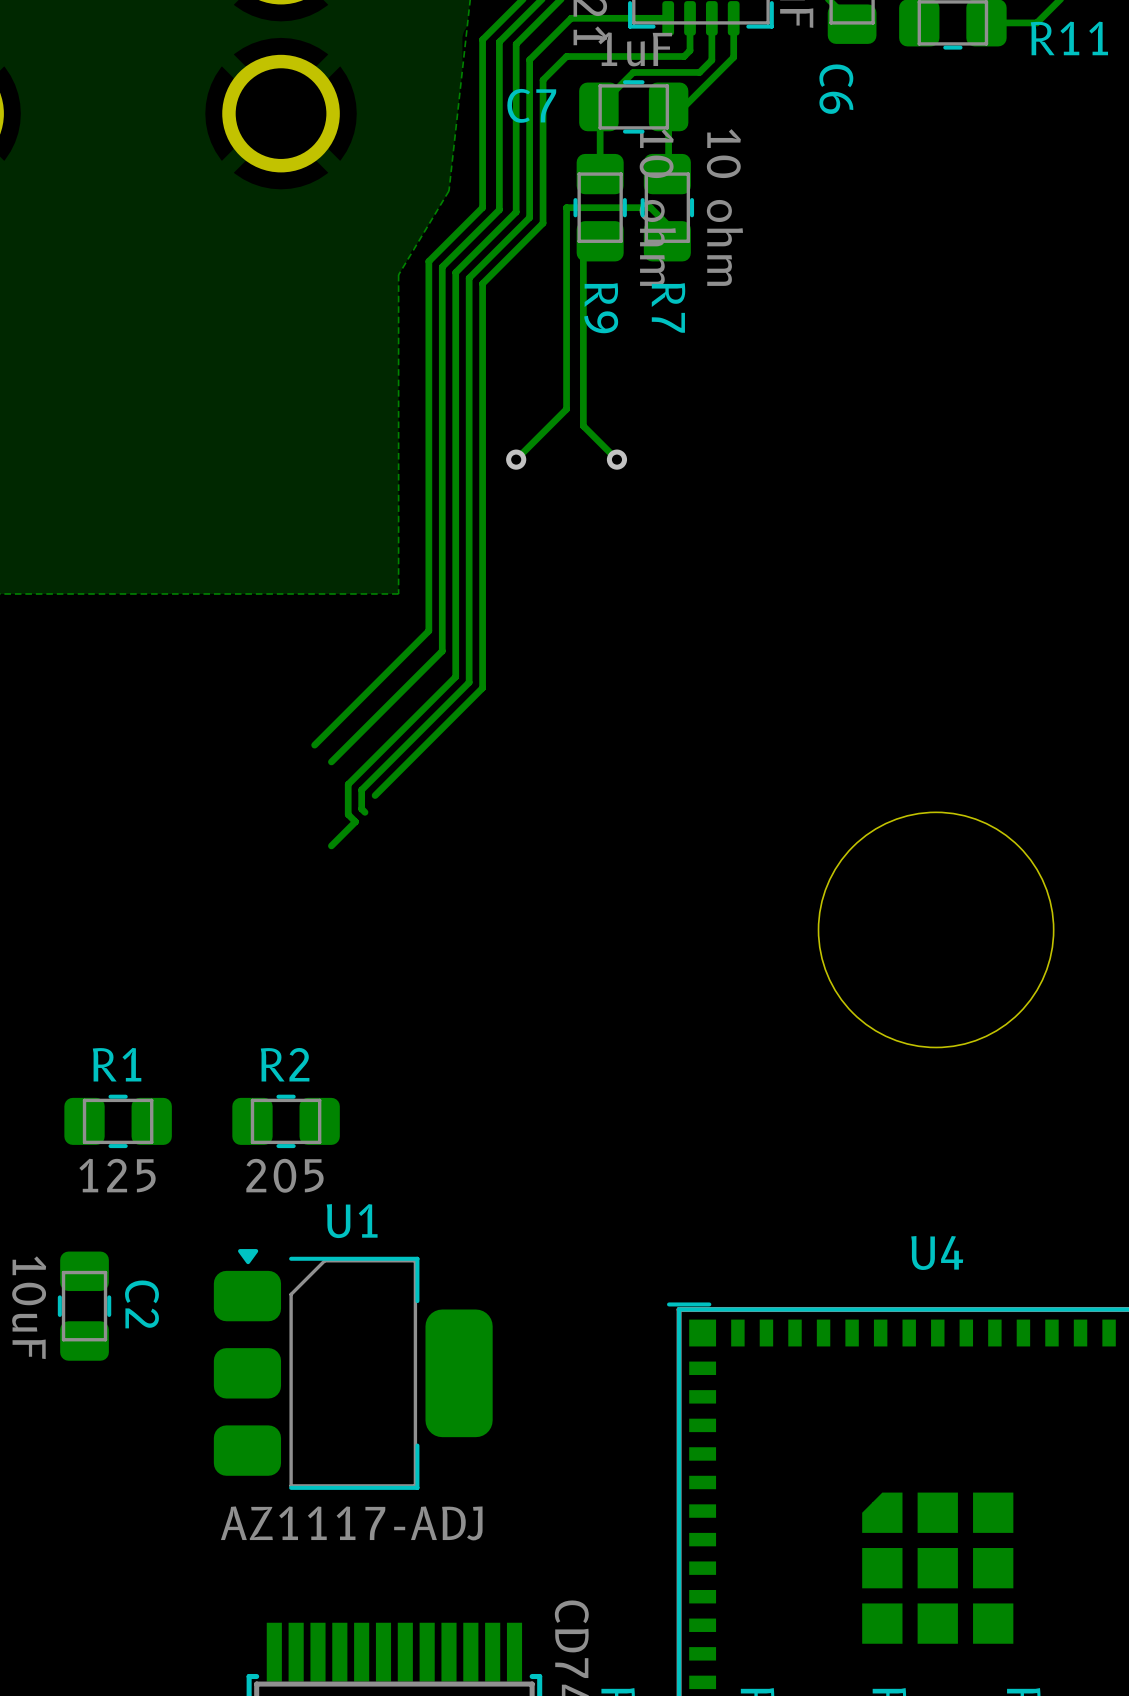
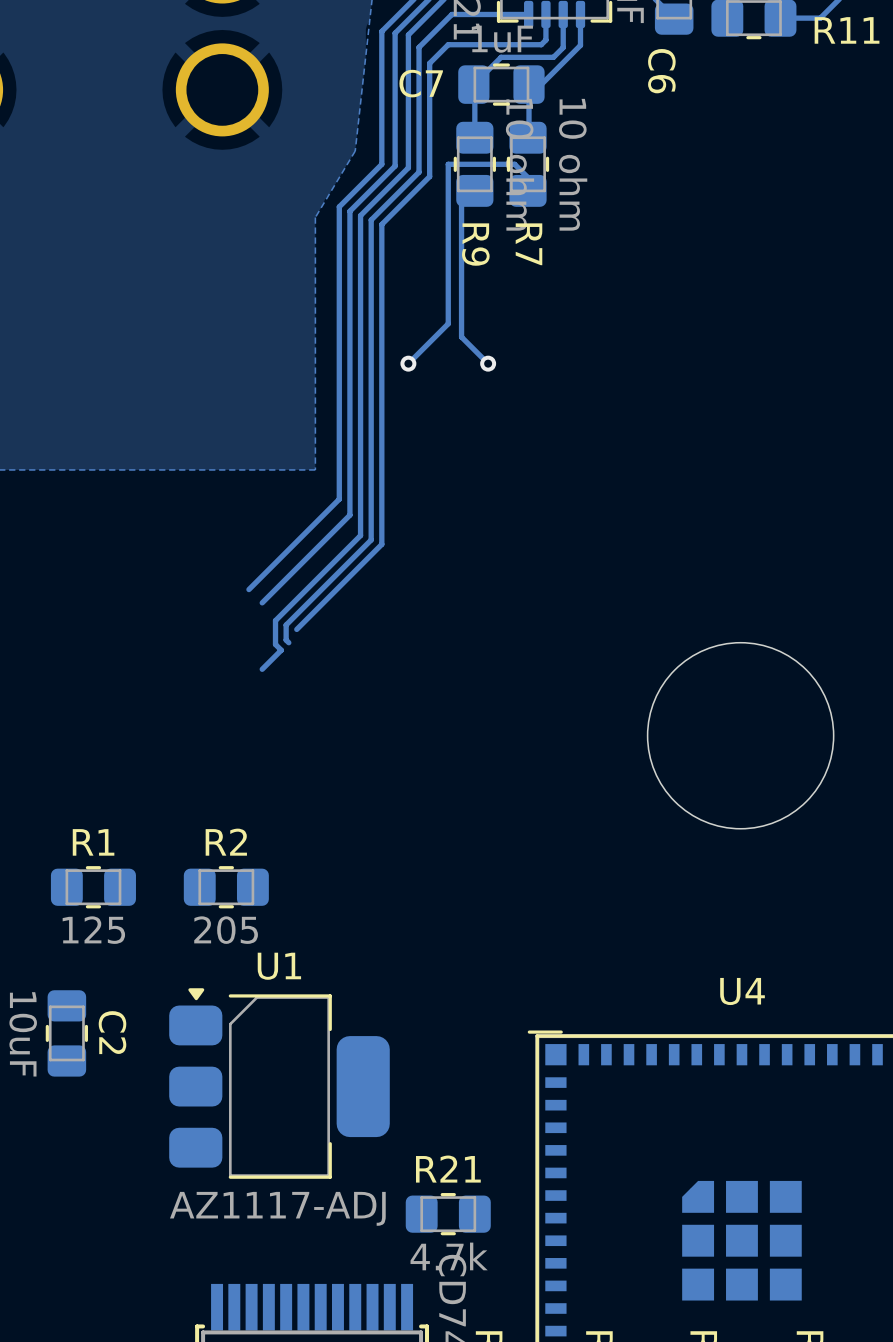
R21: none -> 4.7k (448, 1214)

